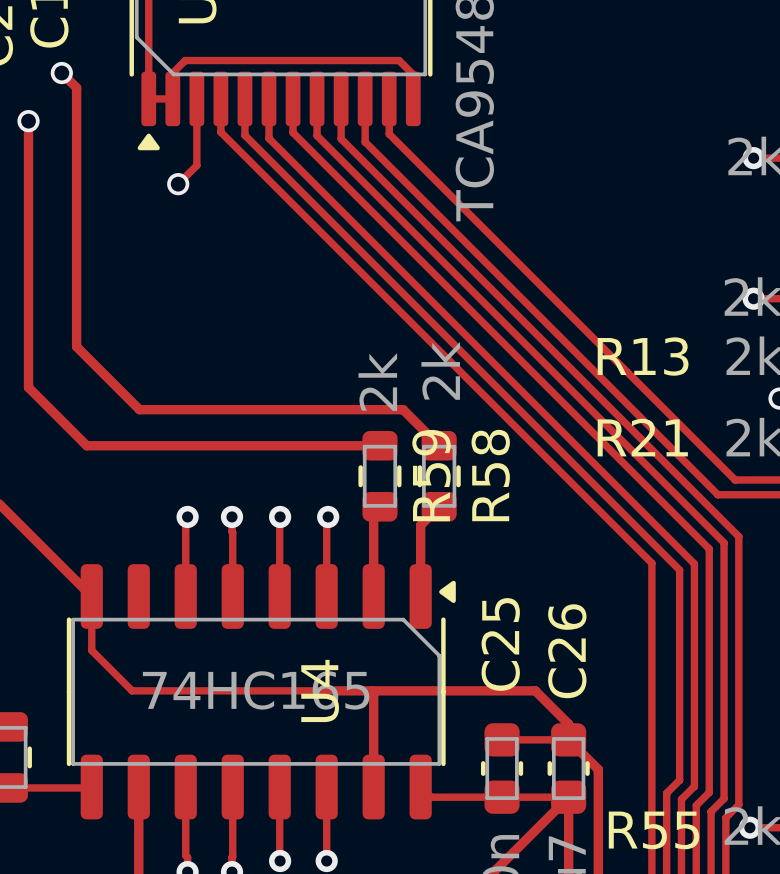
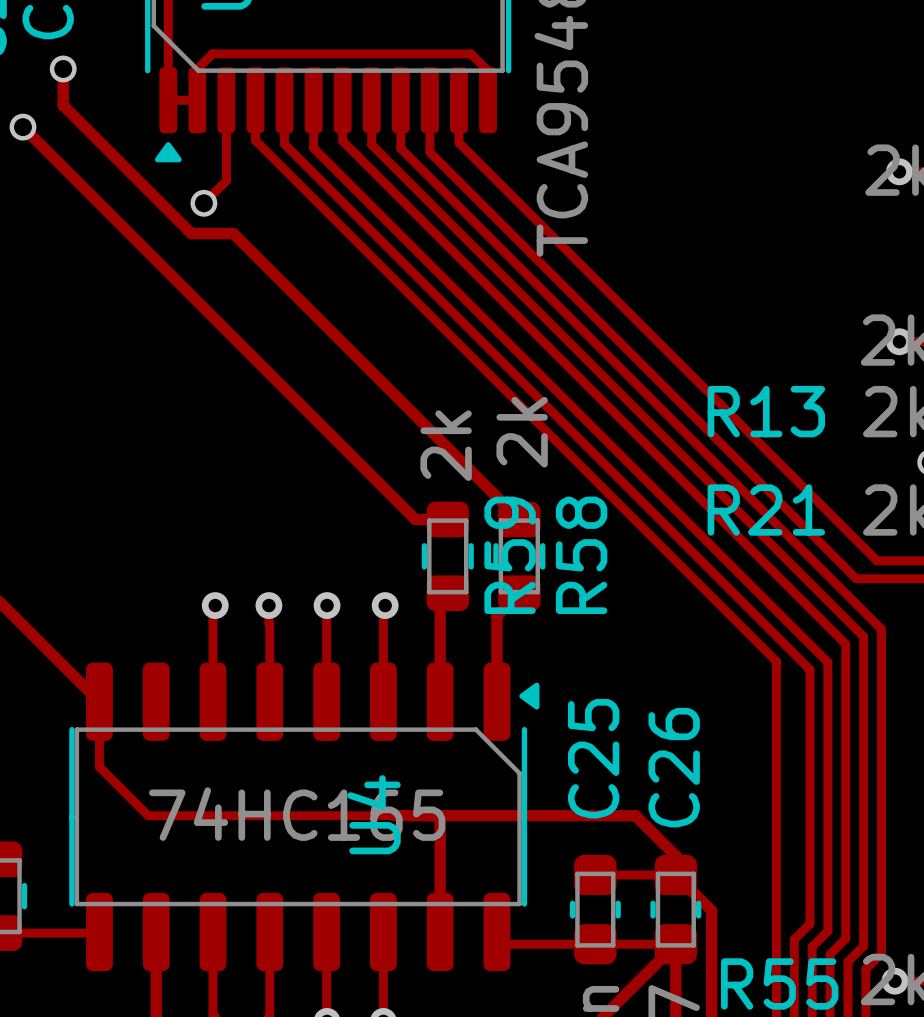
track: (61, 73) (76, 87) (76, 346) (139, 409) (403, 409) -> (63, 68) (63, 105) (191, 233) (233, 233) (475, 475)
track: (28, 121) (28, 387) (86, 445) (353, 445) -> (22, 127) (415, 519)

